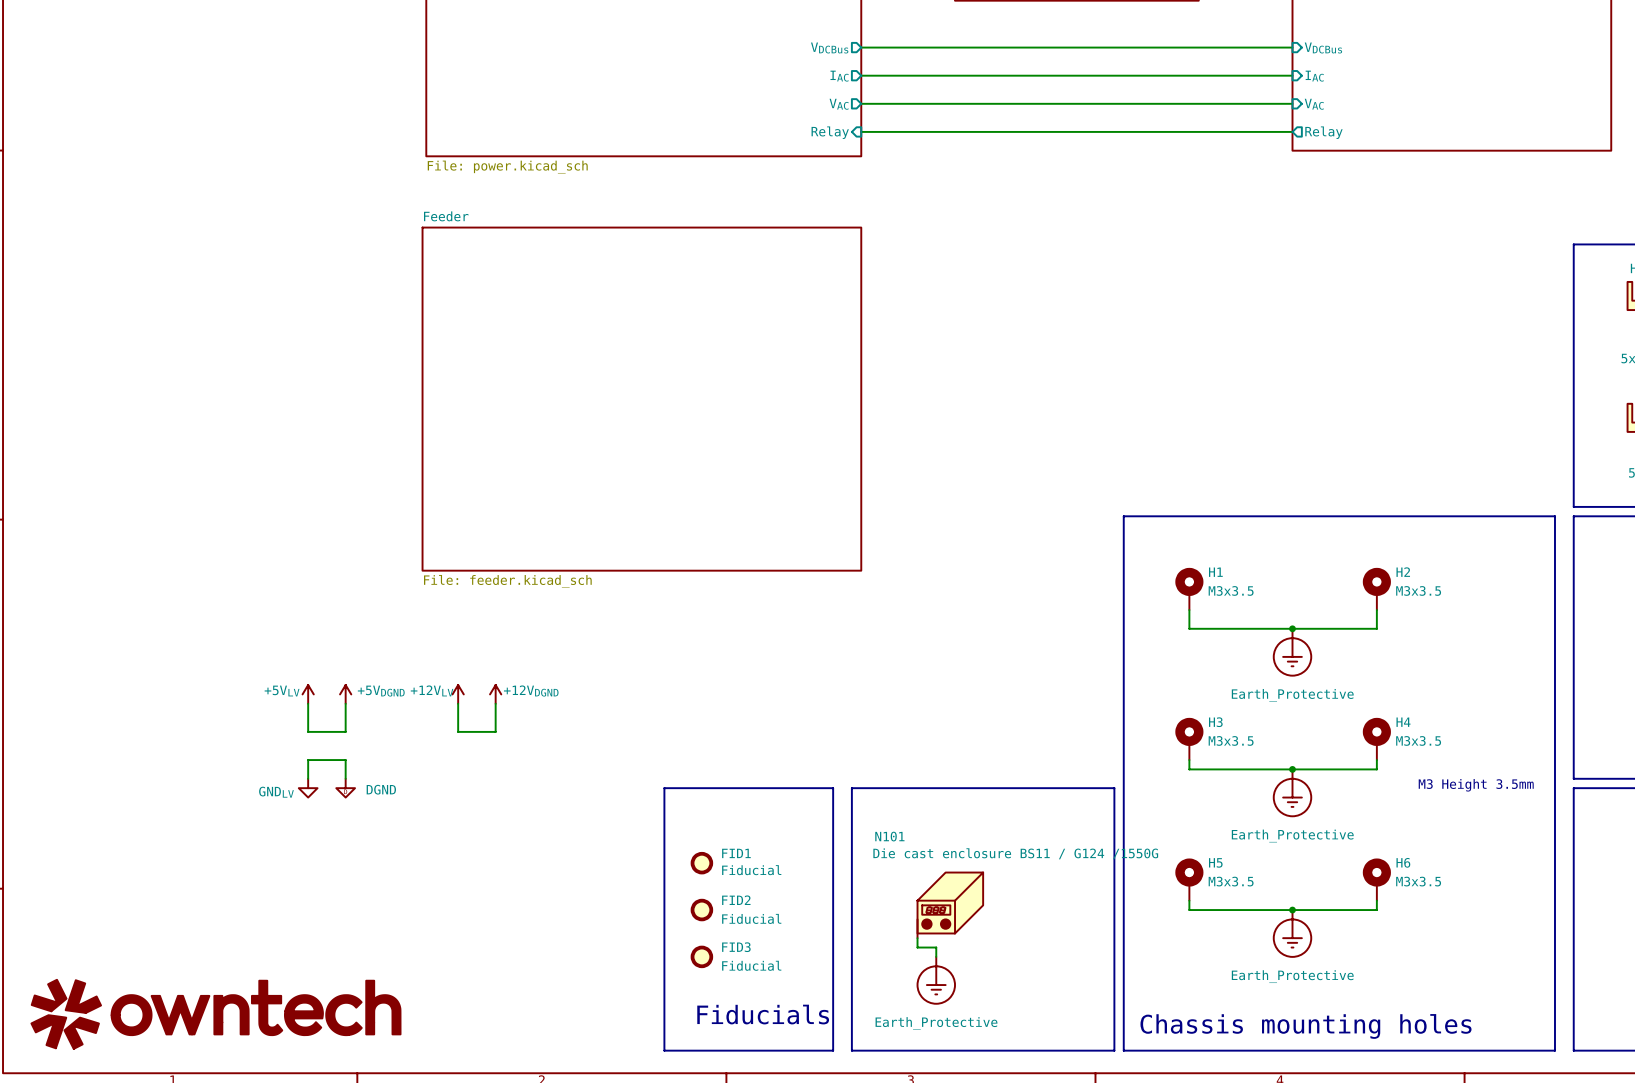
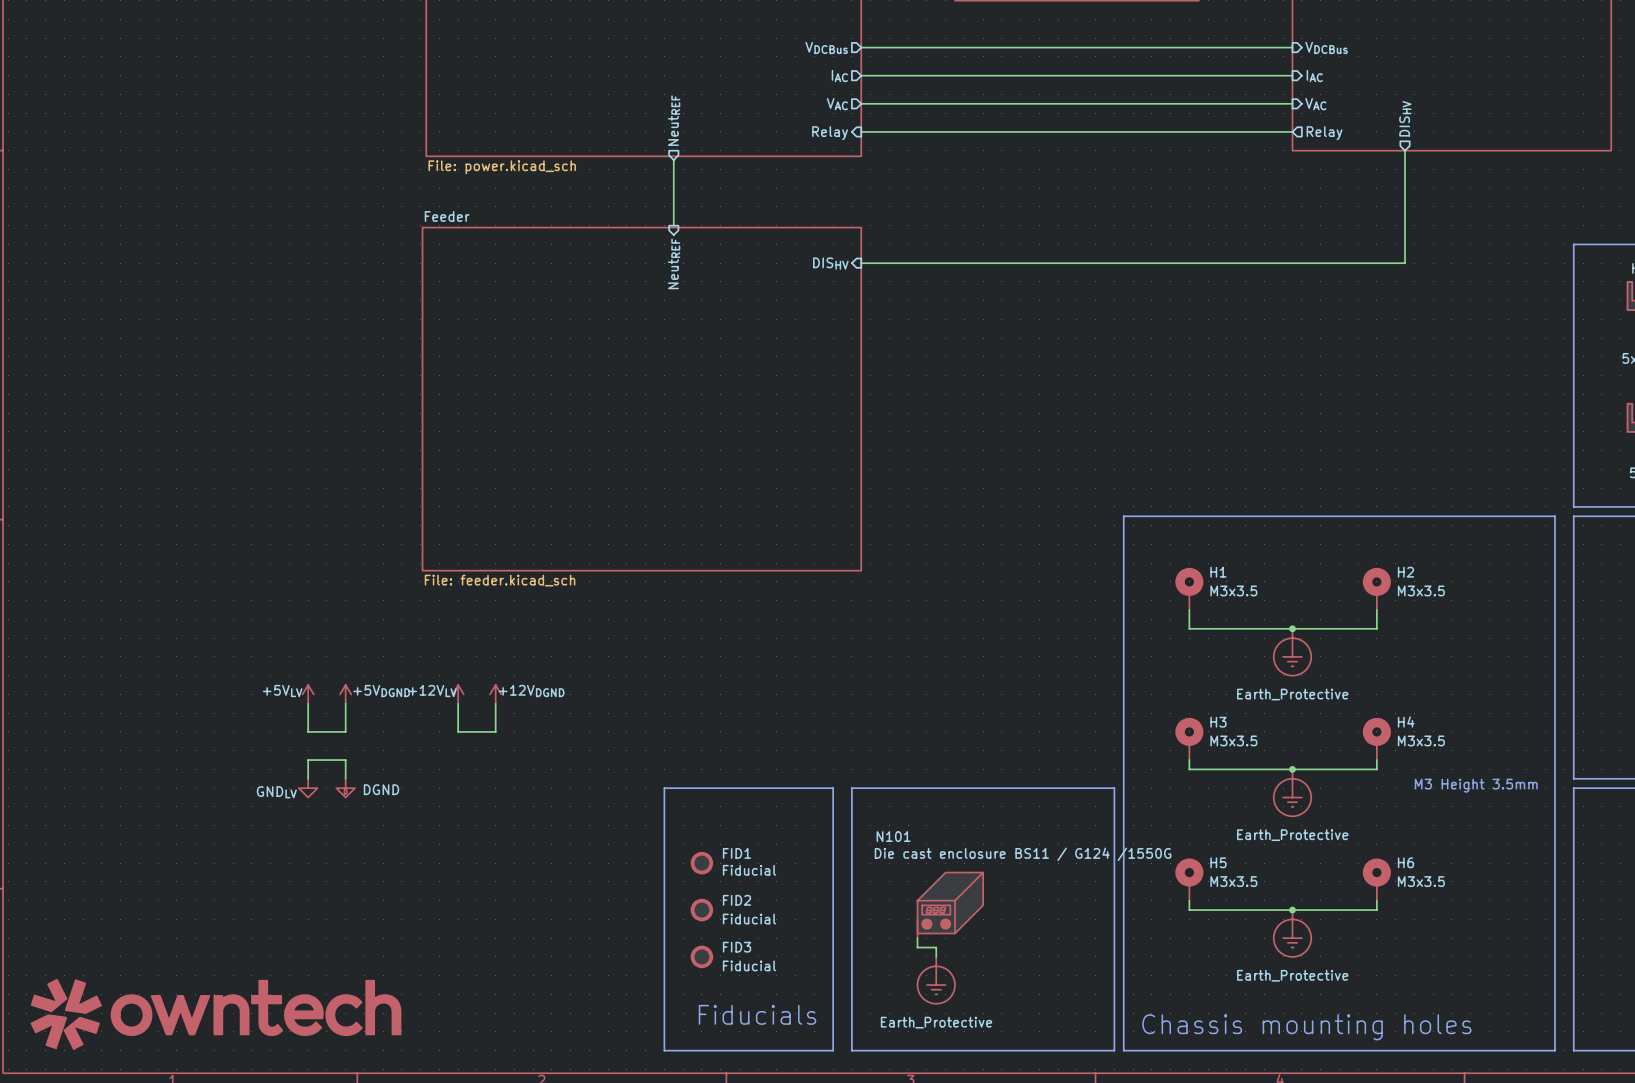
sheet pin: none -> DISHV (1405, 118)
sheet pin: none -> NeutREF (674, 120)
wire: none -> (1405, 150) (1405, 263) (861, 263)
wire: none -> (673, 160) (673, 225)
sheet pin: none -> NeutREF (674, 263)
sheet pin: none -> DISHV (830, 263)

